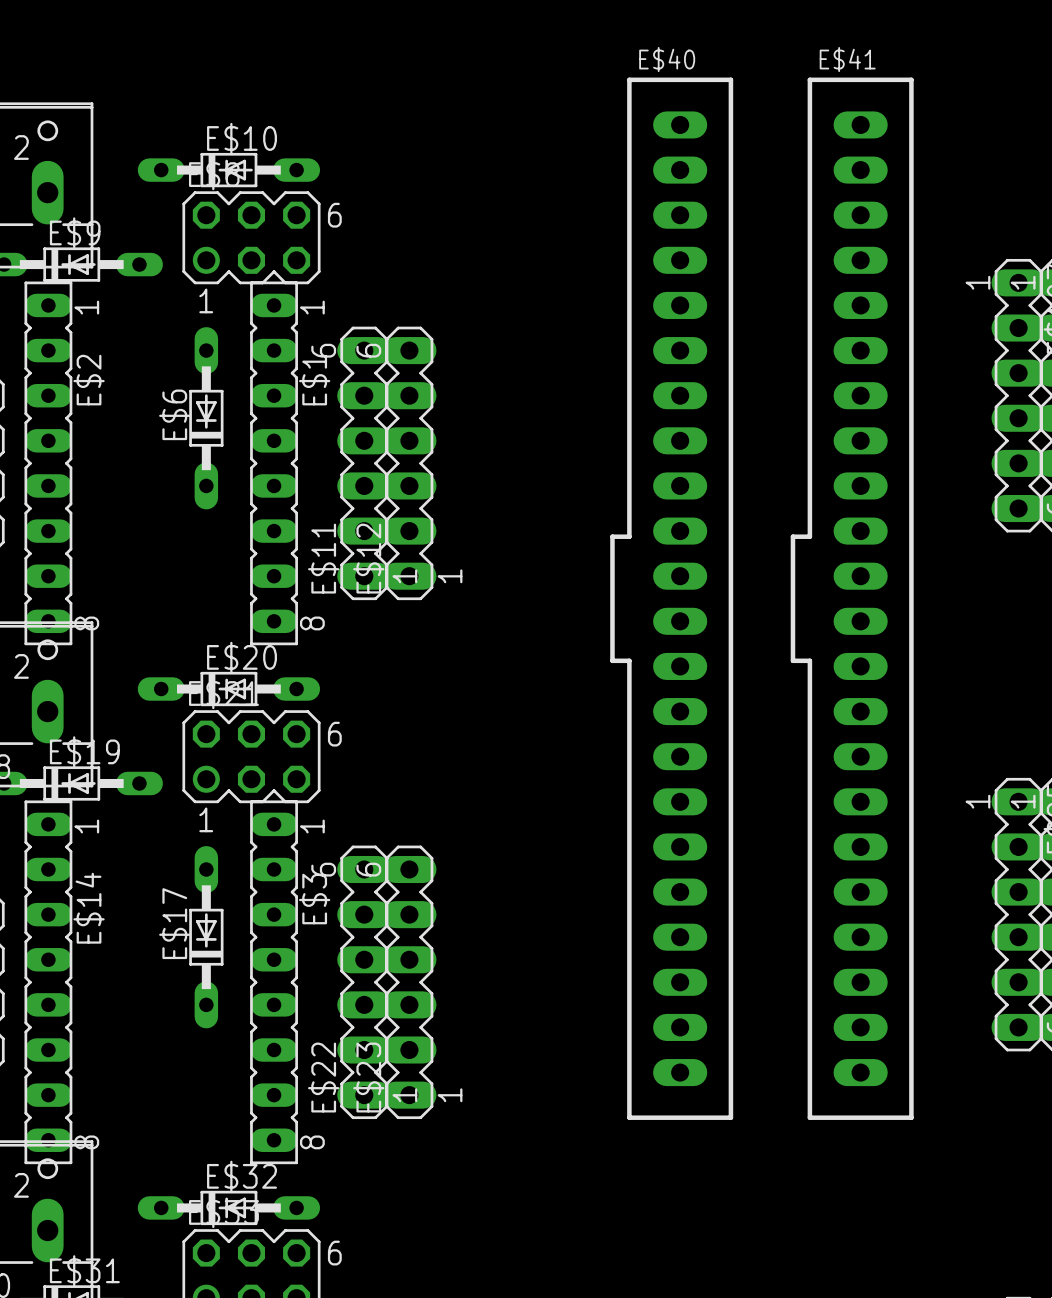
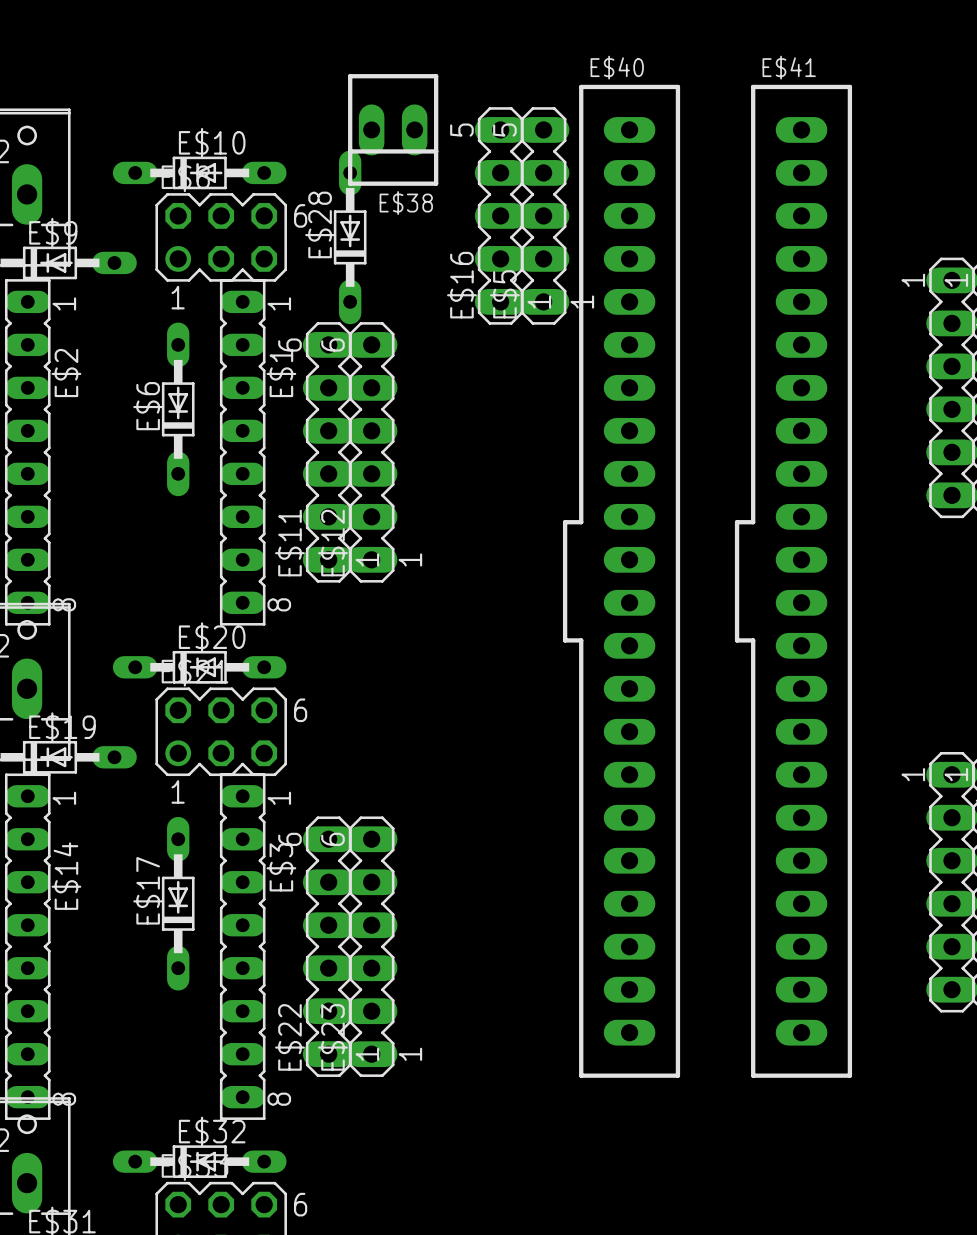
E$38: none -> (393, 129)
E$16: none -> (500, 215)
E$5: none -> (543, 215)
E$28: none -> (350, 237)

